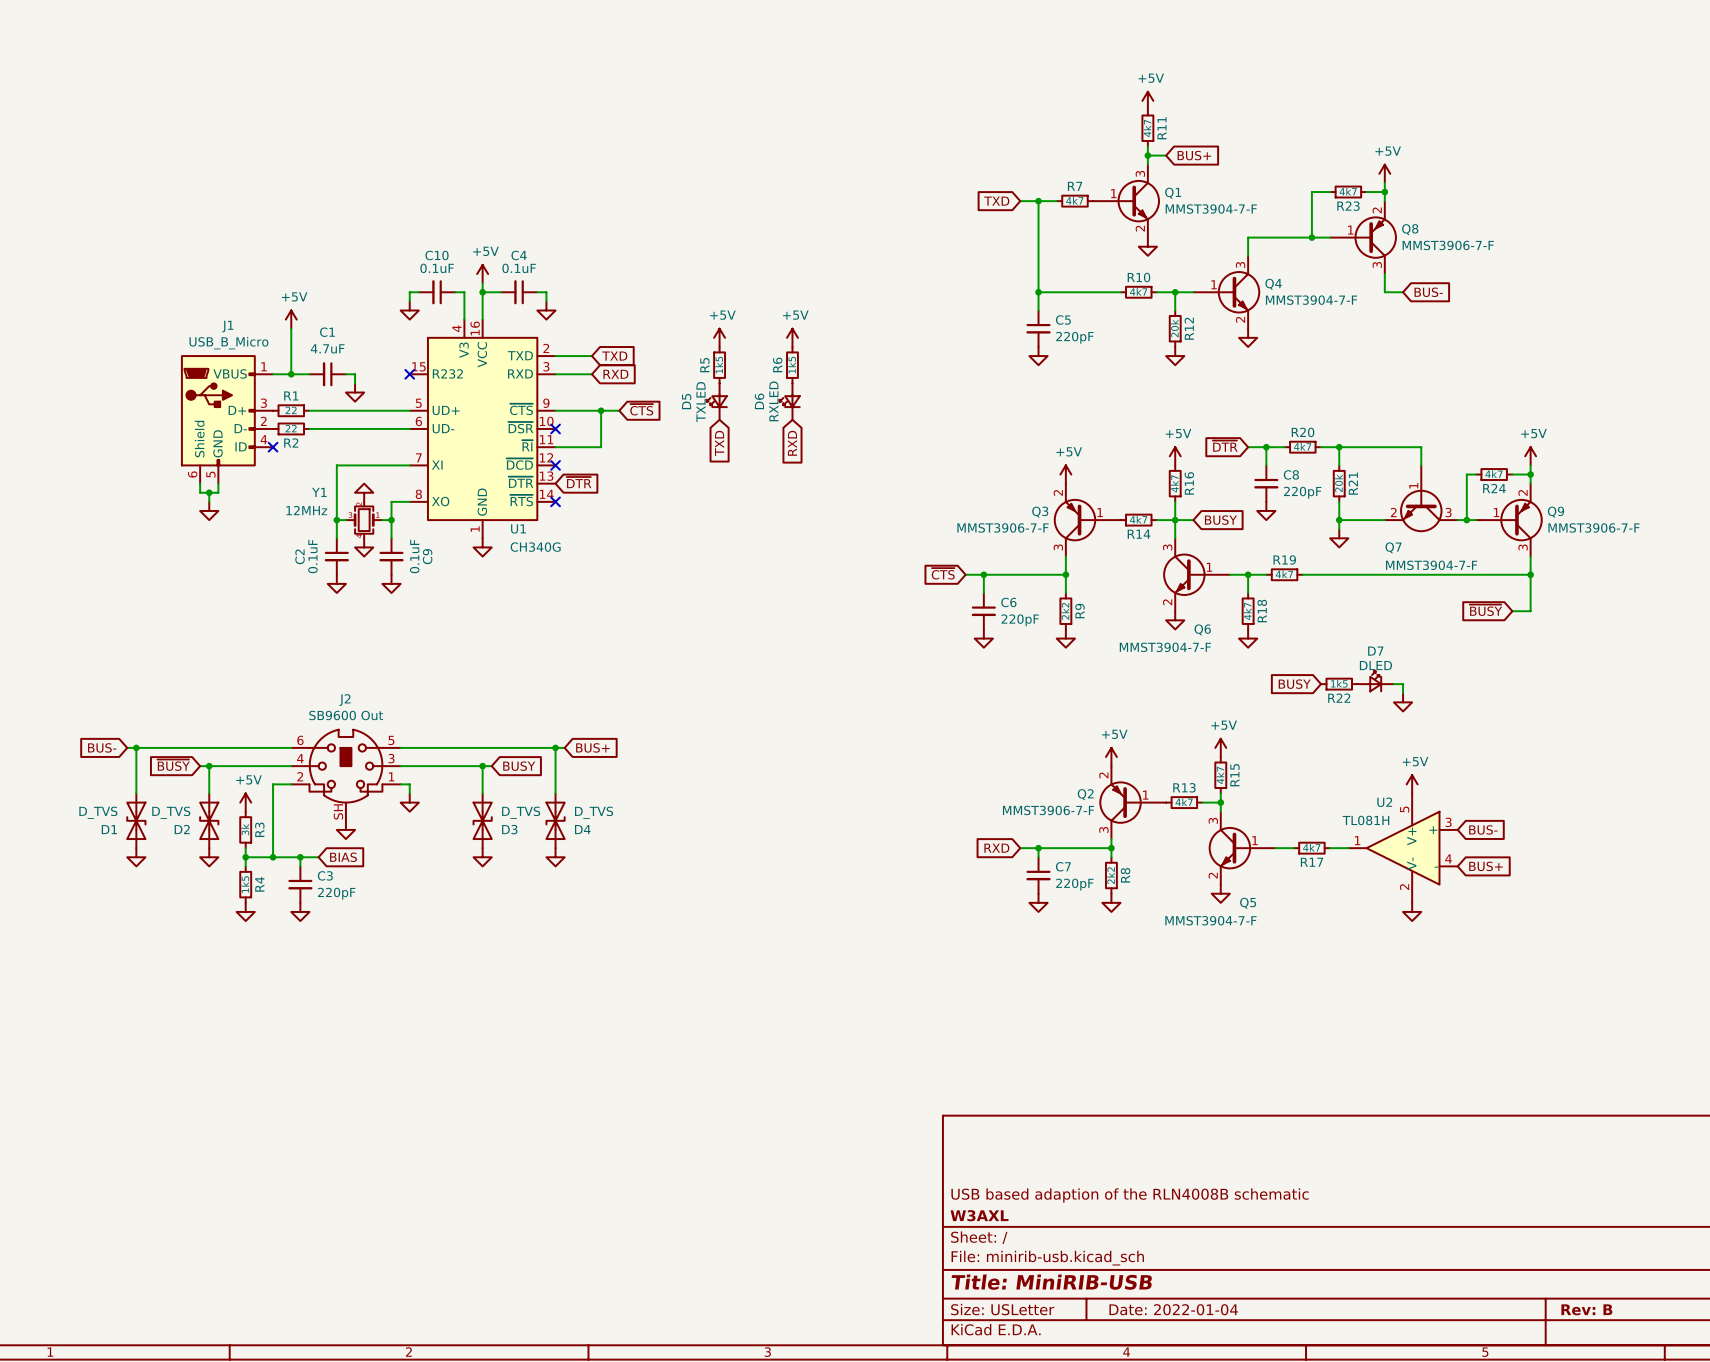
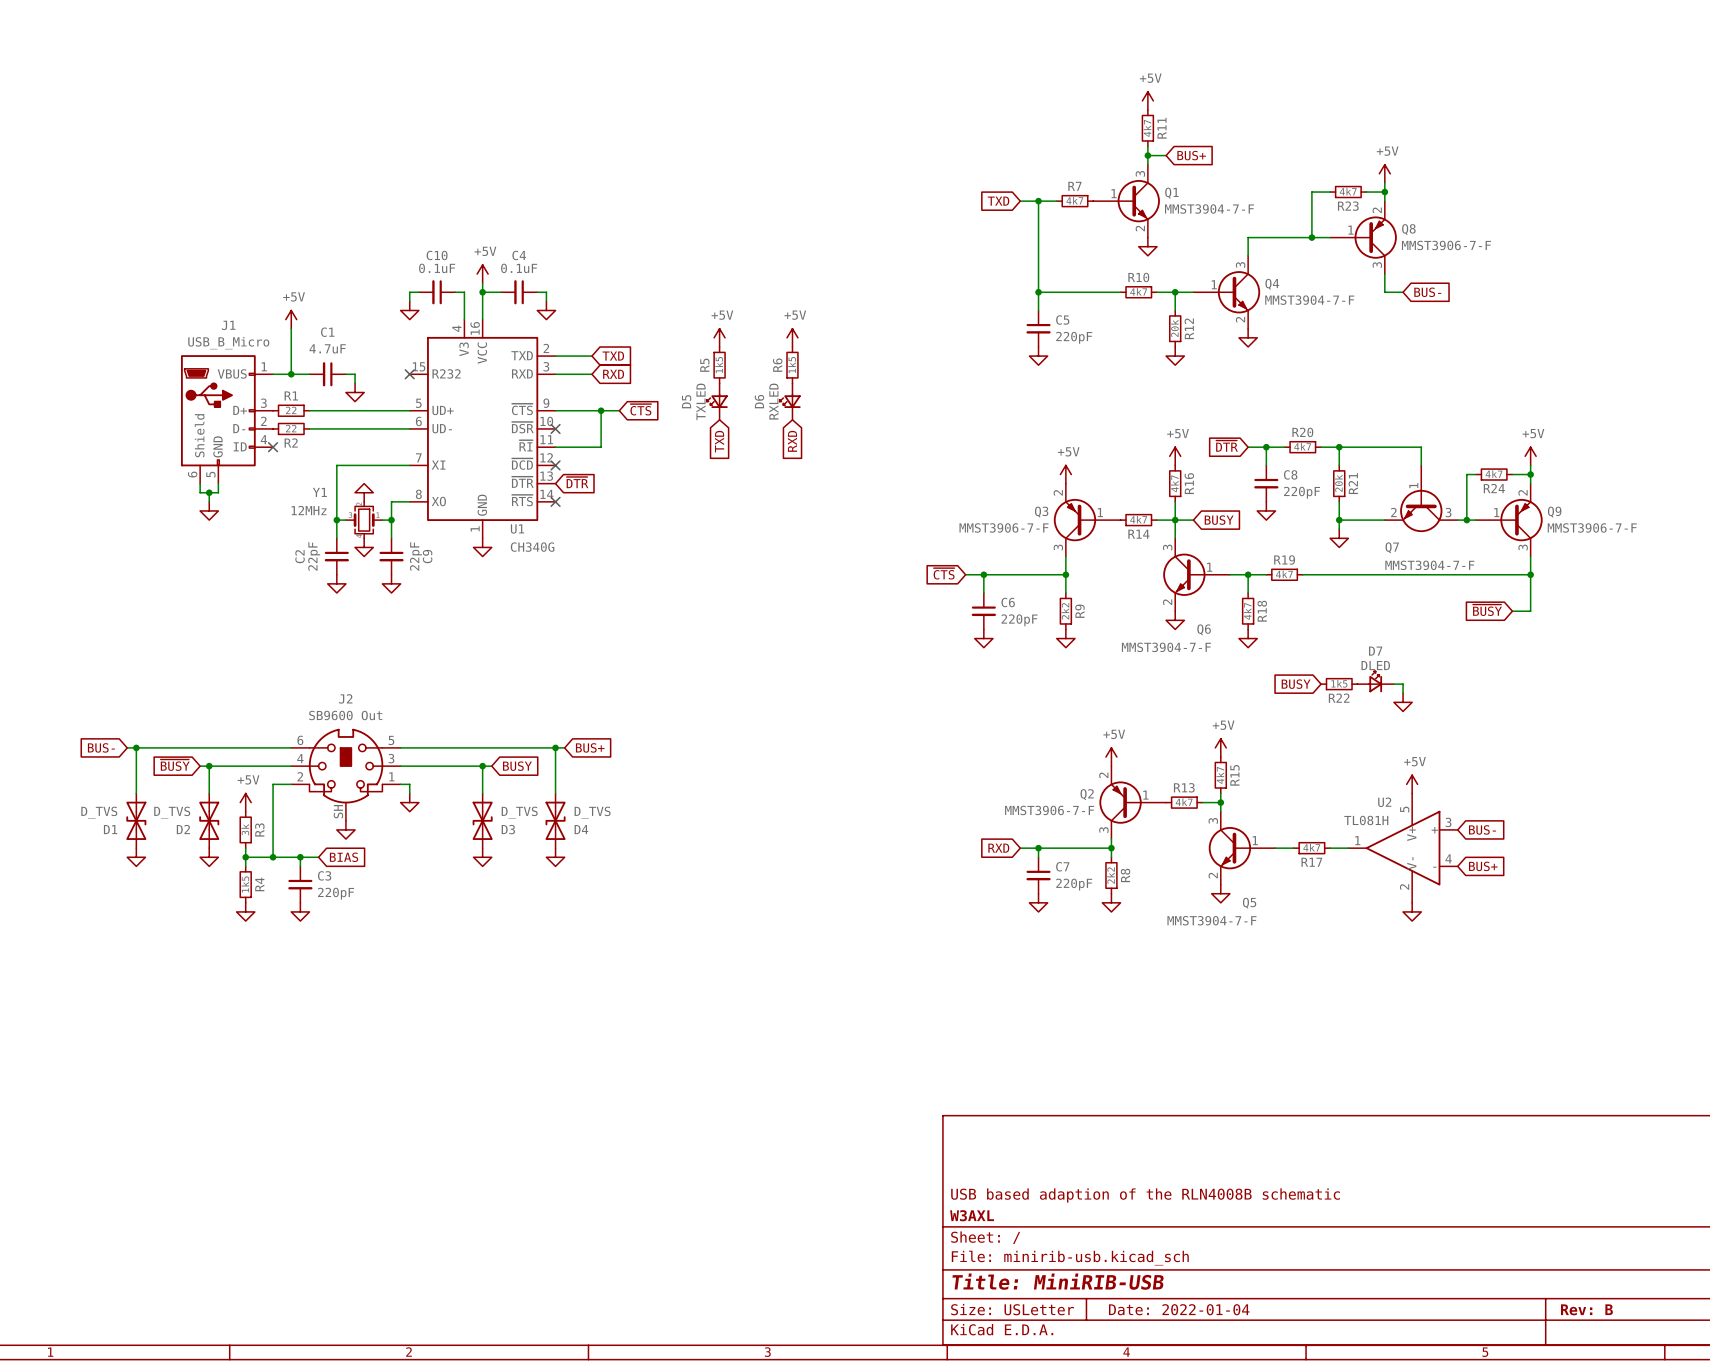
C2 value: 0.1uF (312, 556) -> 22pF (314, 556)
C9 value: 0.1uF (414, 556) -> 22pF (415, 556)

